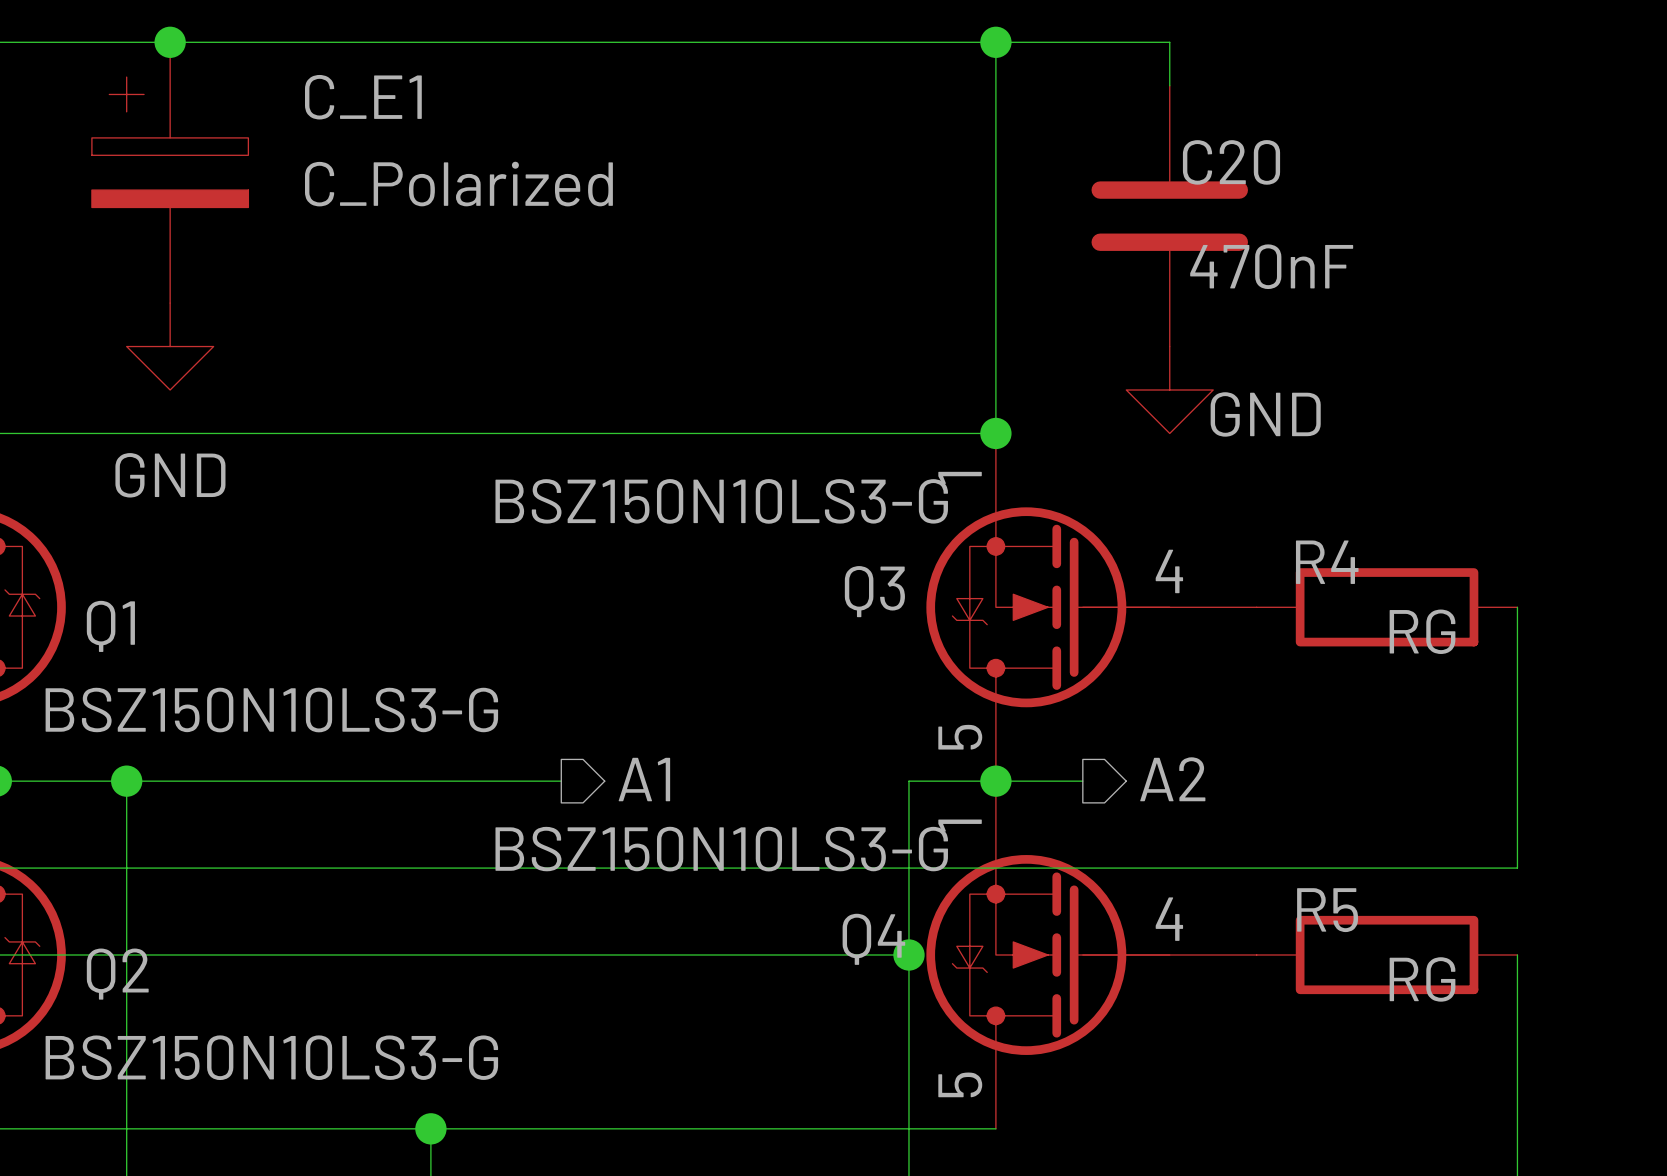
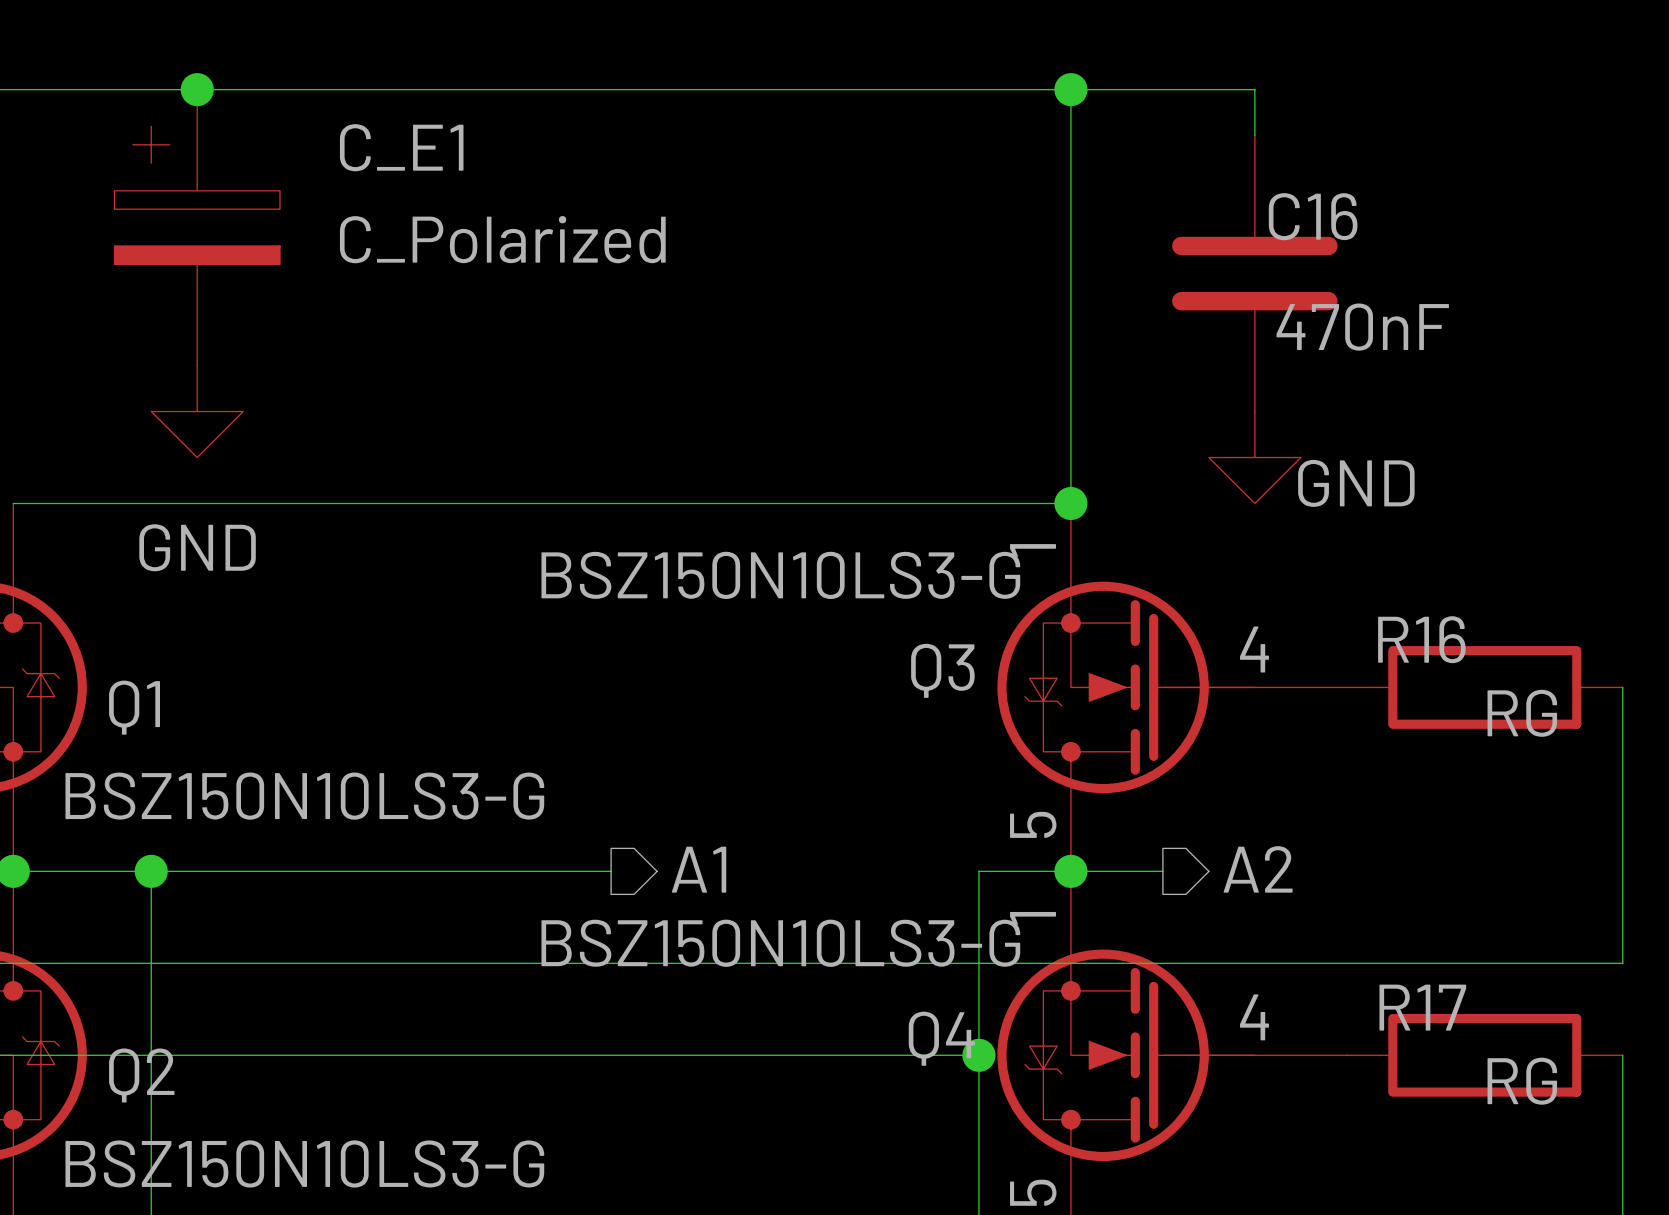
C20 name: C20 (1231, 162) -> C16 (1313, 216)
R4 name: R4 (1327, 562) -> R16 (1421, 639)
R5 name: R5 (1327, 910) -> R17 (1422, 1007)

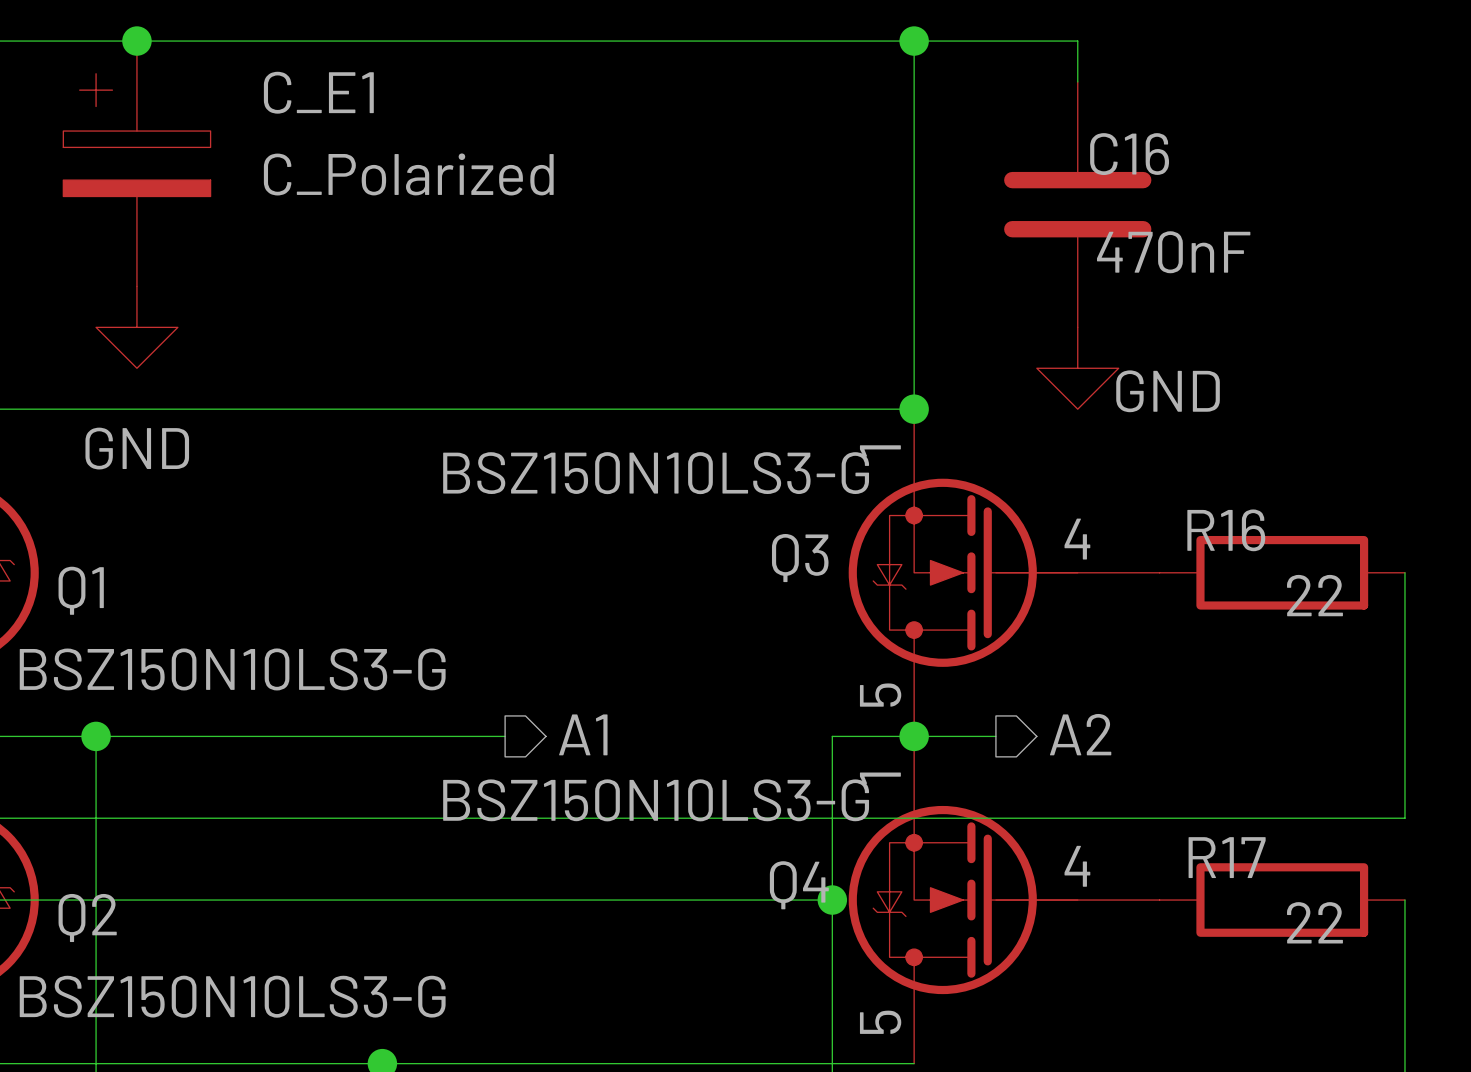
R16 value: RG (1522, 713) -> 22 (1314, 595)
R17 value: RG (1522, 1081) -> 22 (1314, 922)

